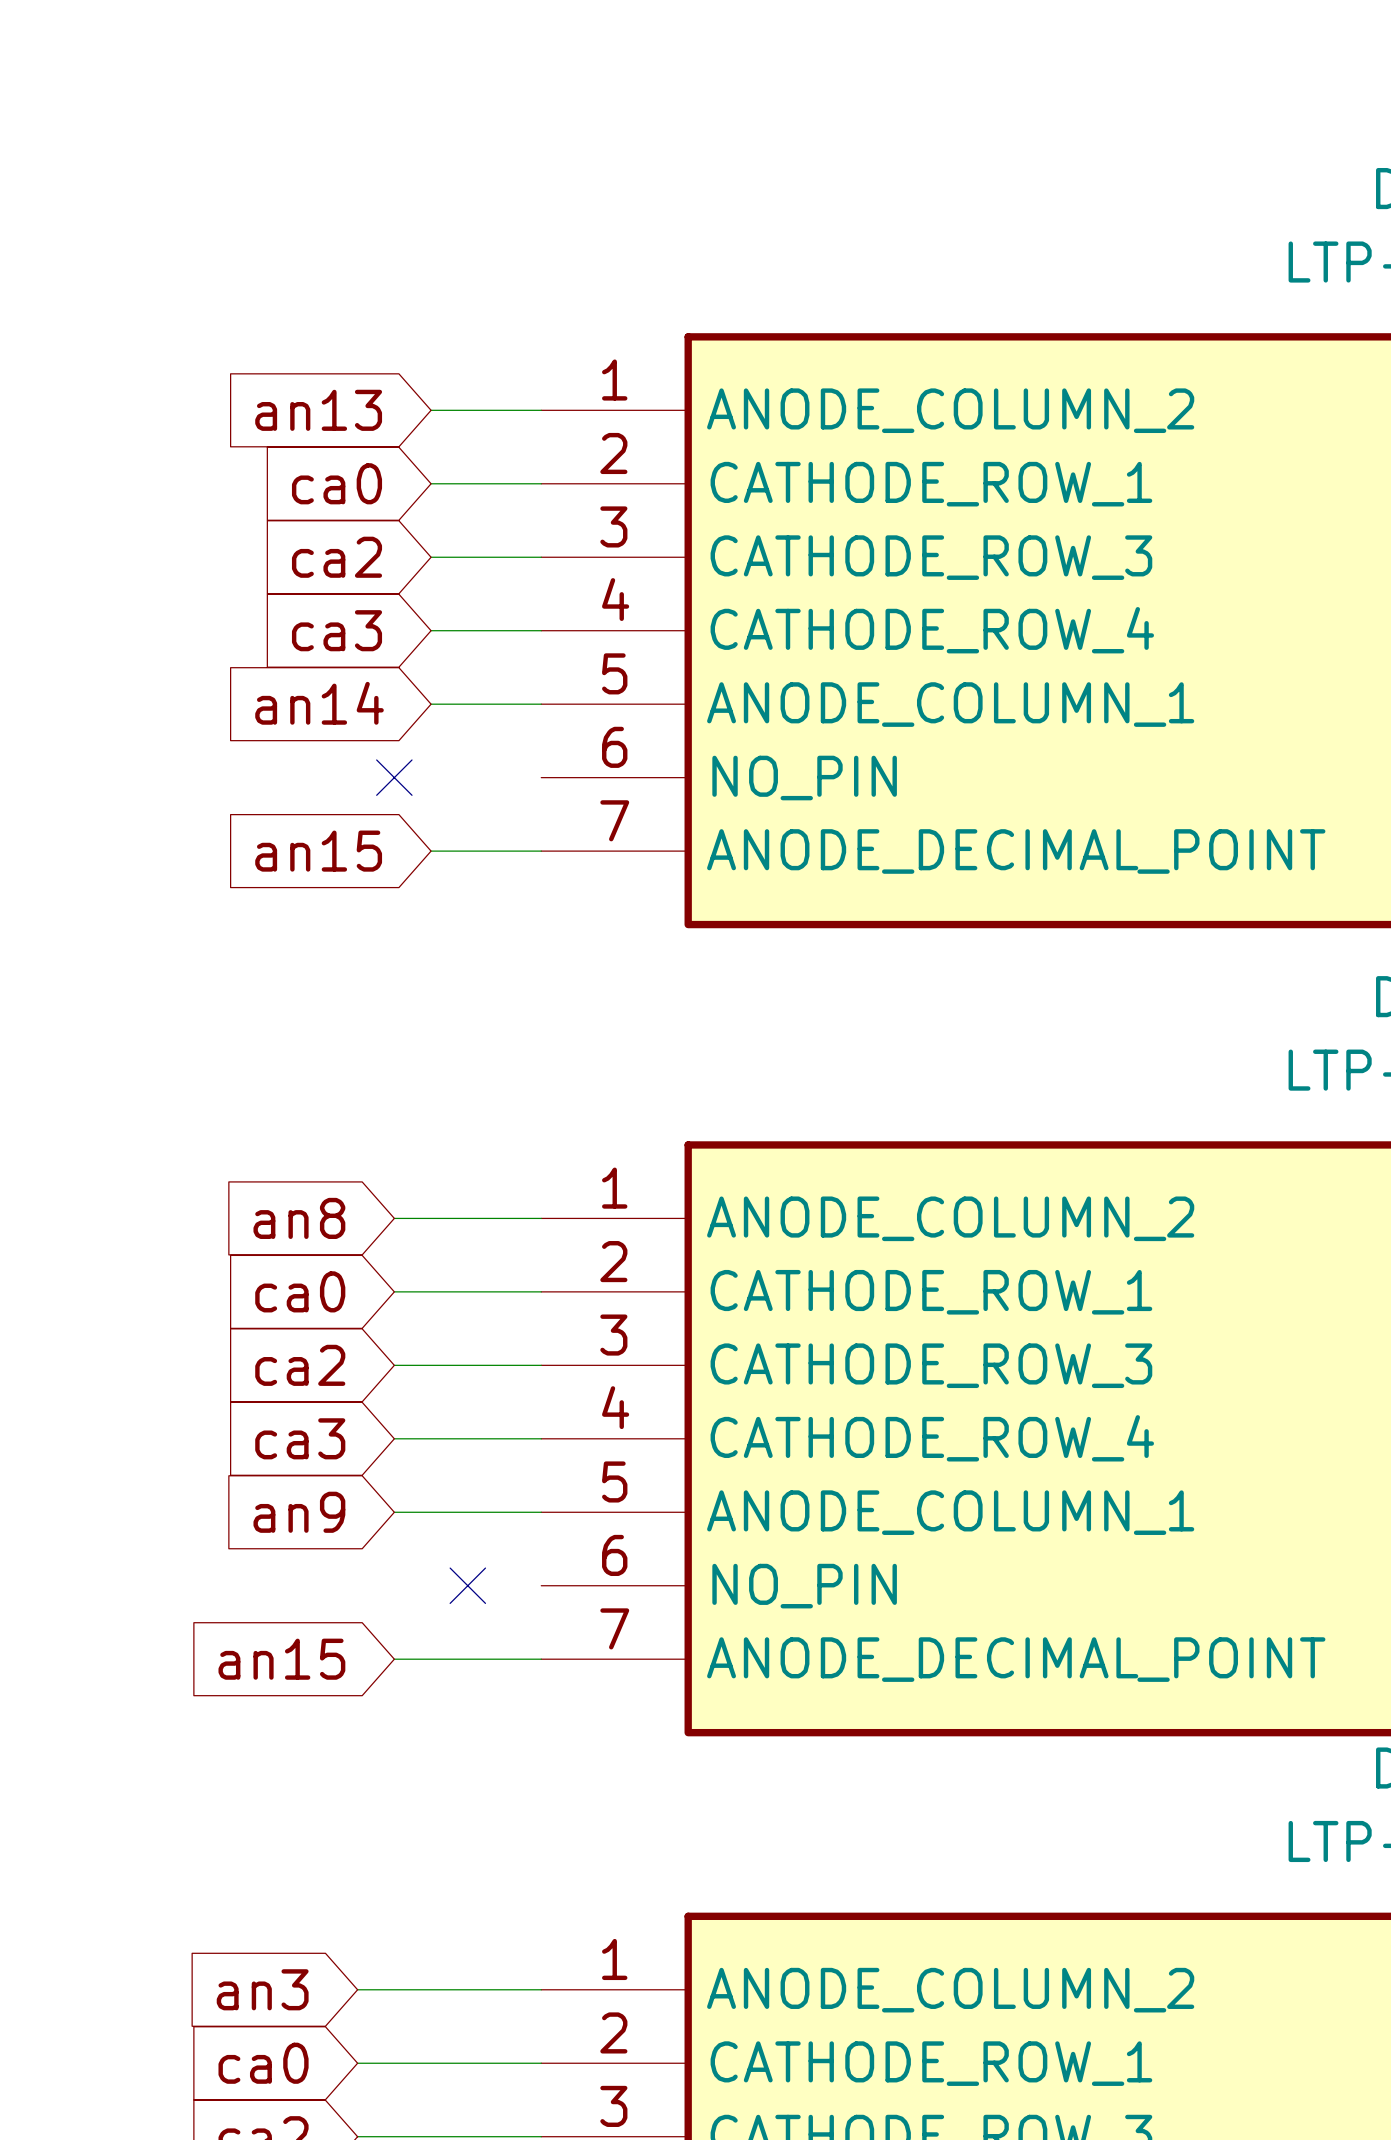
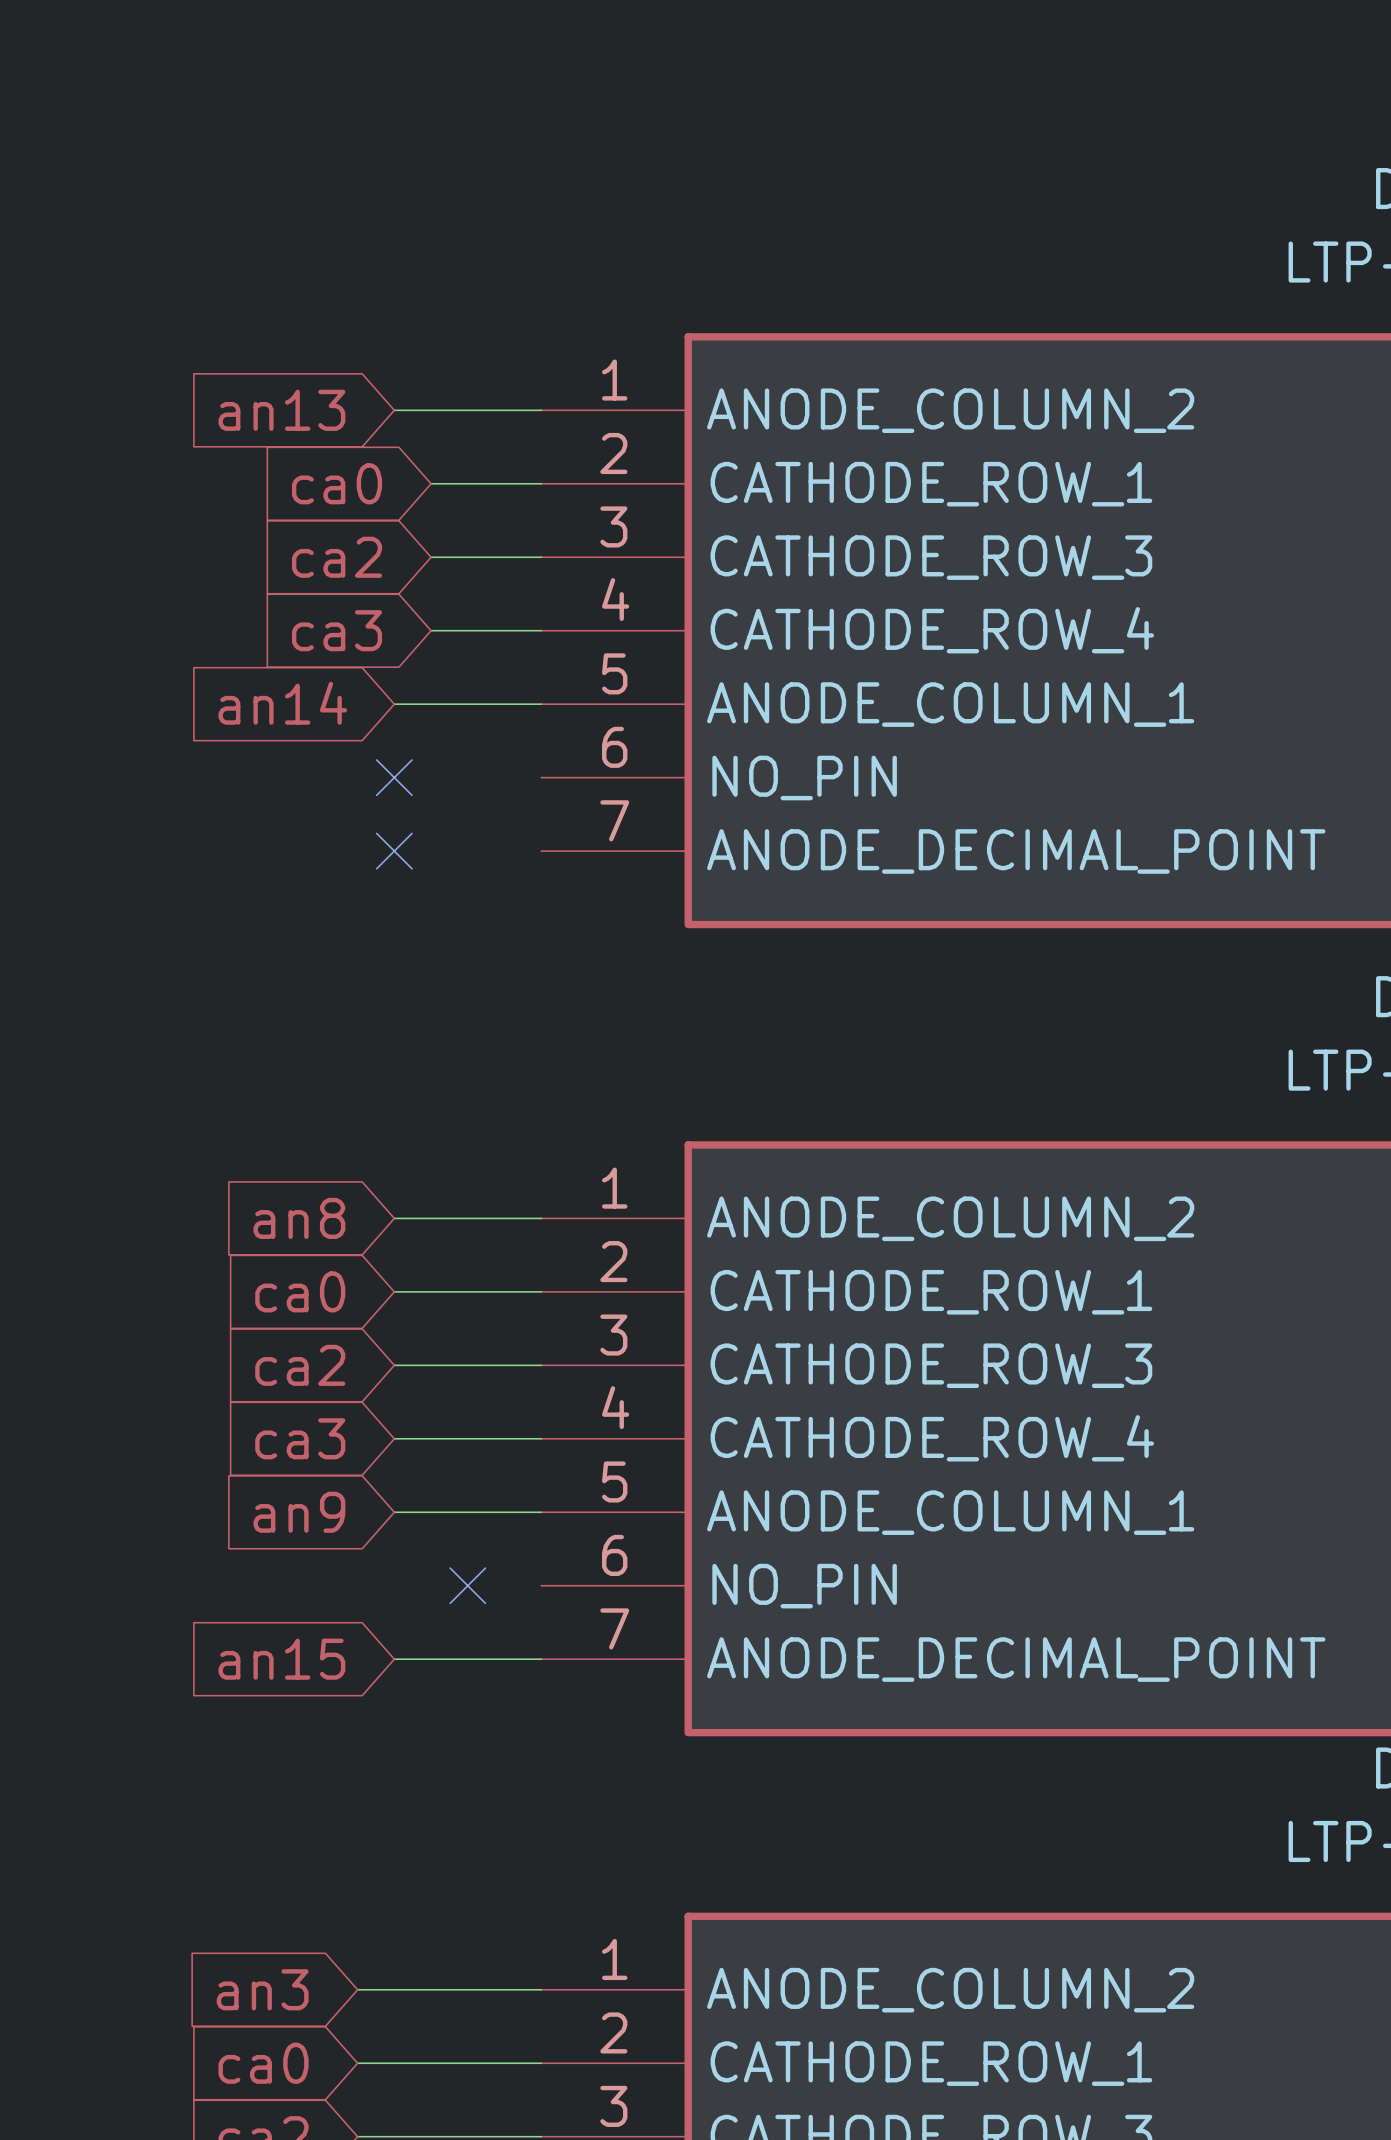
global label position: an13 (318, 410) -> an13 (281, 410)
wire: none -> (394, 410) (431, 410)
global label position: an14 (319, 703) -> an14 (282, 703)
wire: none -> (394, 704) (431, 704)
global label: an15 (318, 851) -> none
no-connect mark: none -> (394, 851)
wire: (431, 851) (541, 851) -> none

